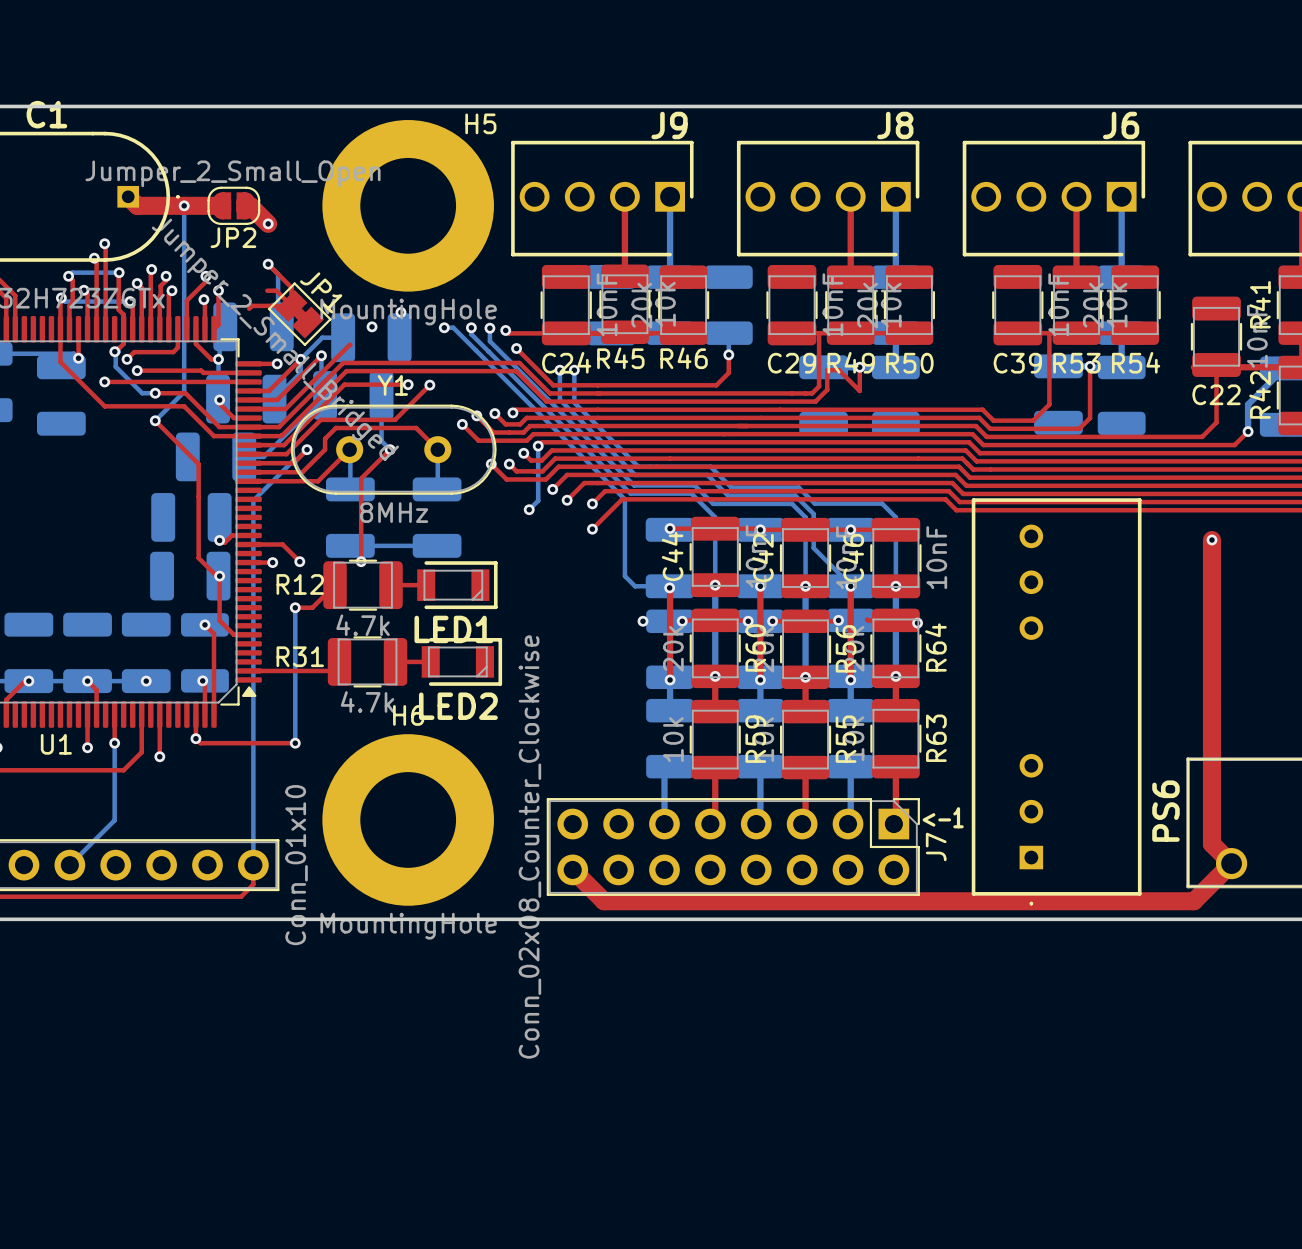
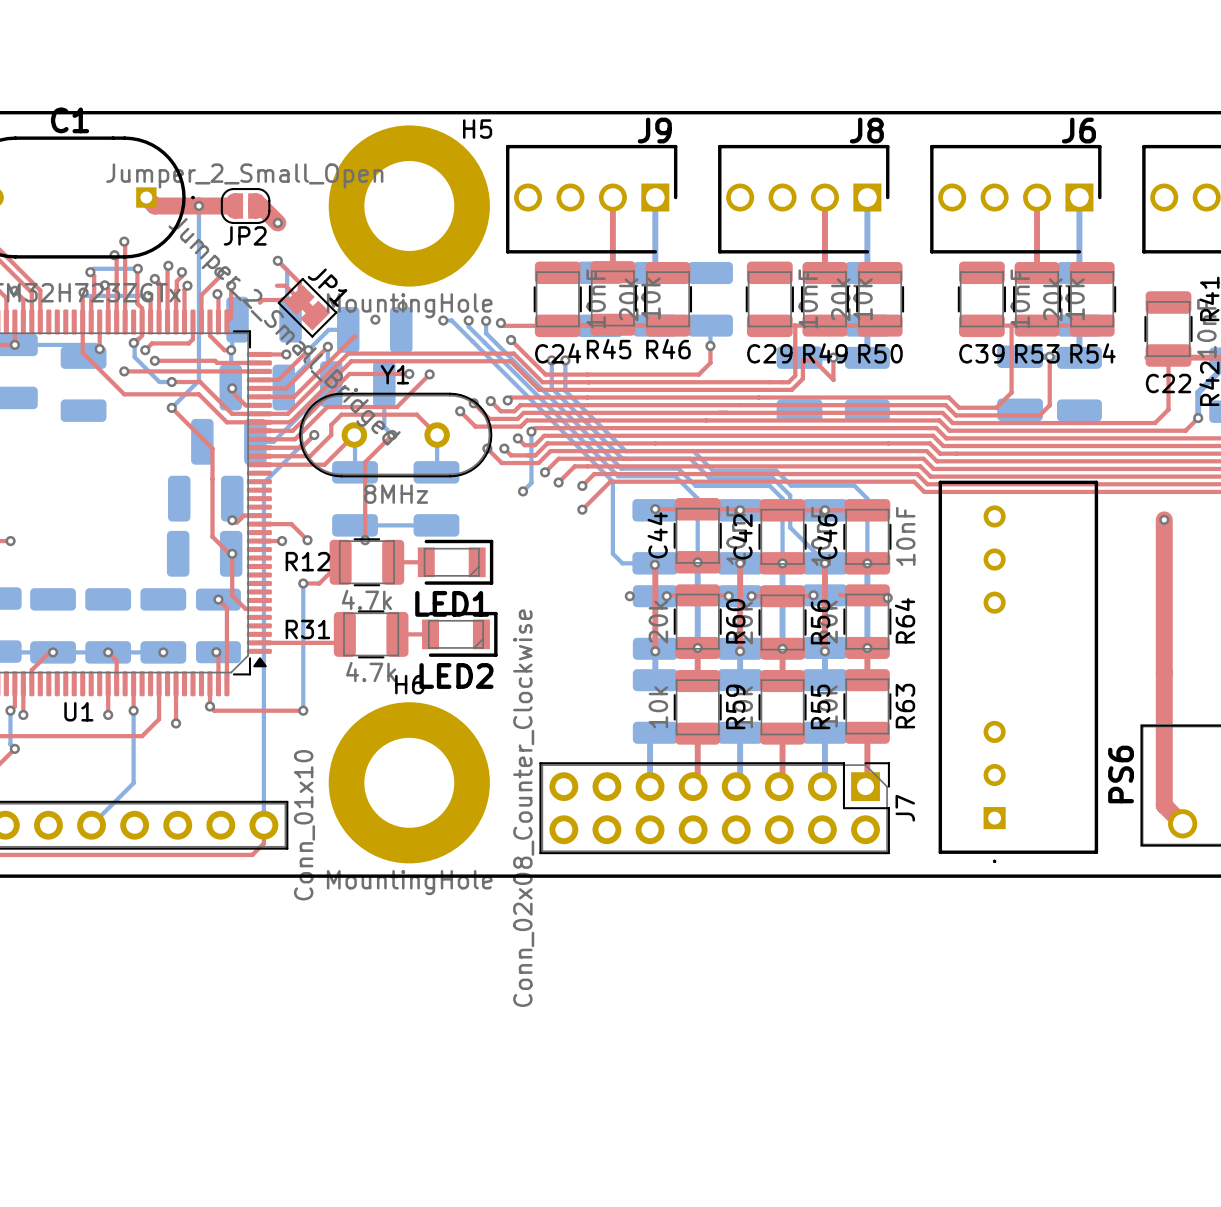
text: <-1 (943, 817) -> none
top track: (1231, 863) (1193, 901) (604, 901) (572, 869) -> none

